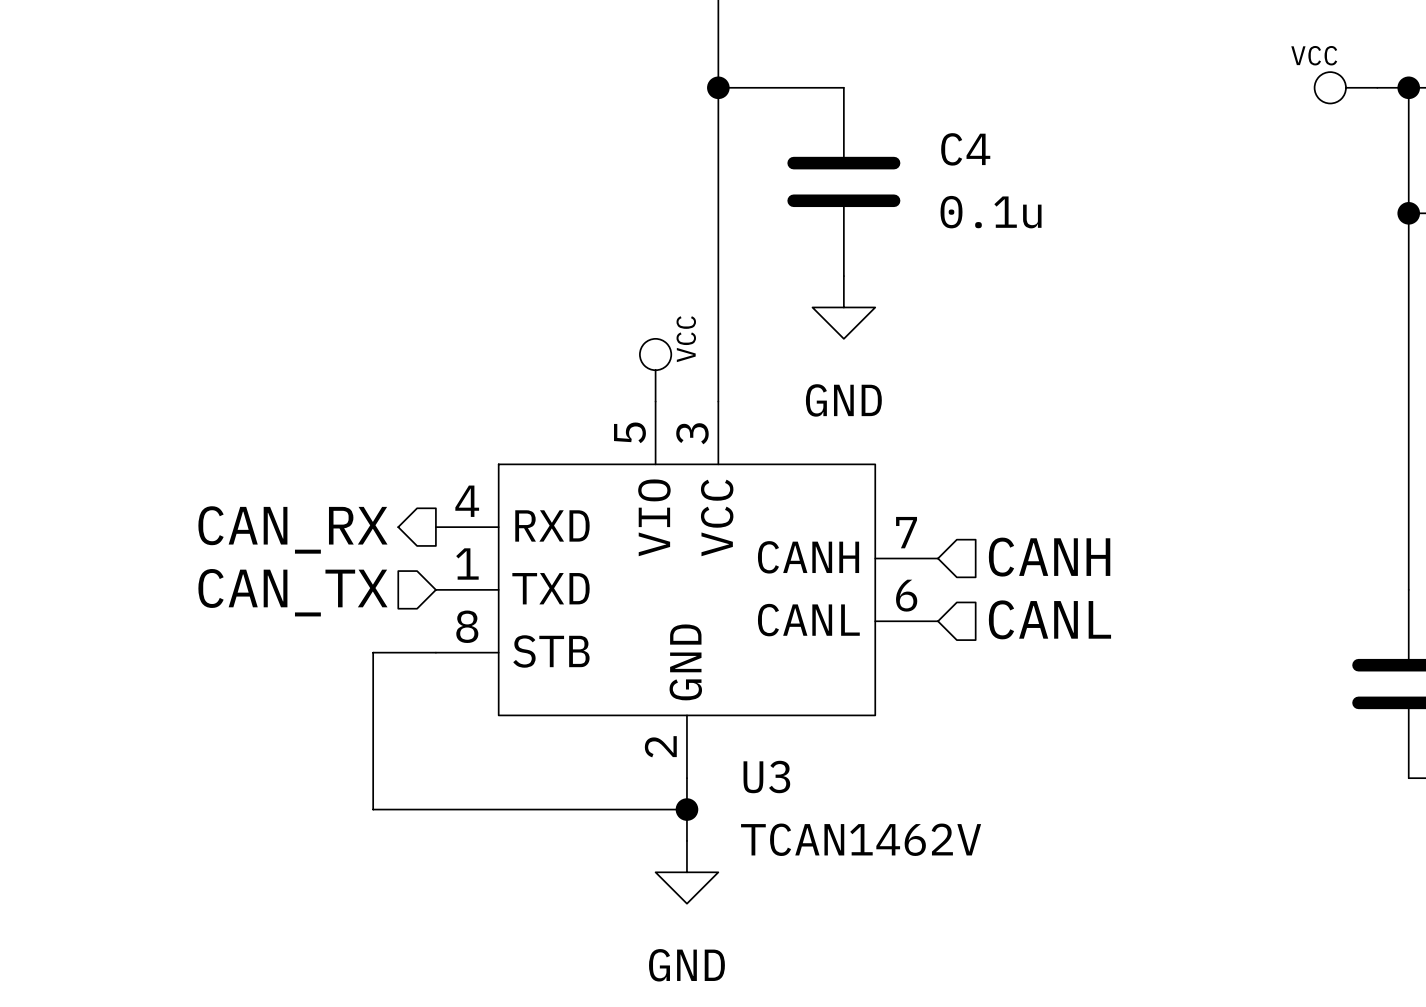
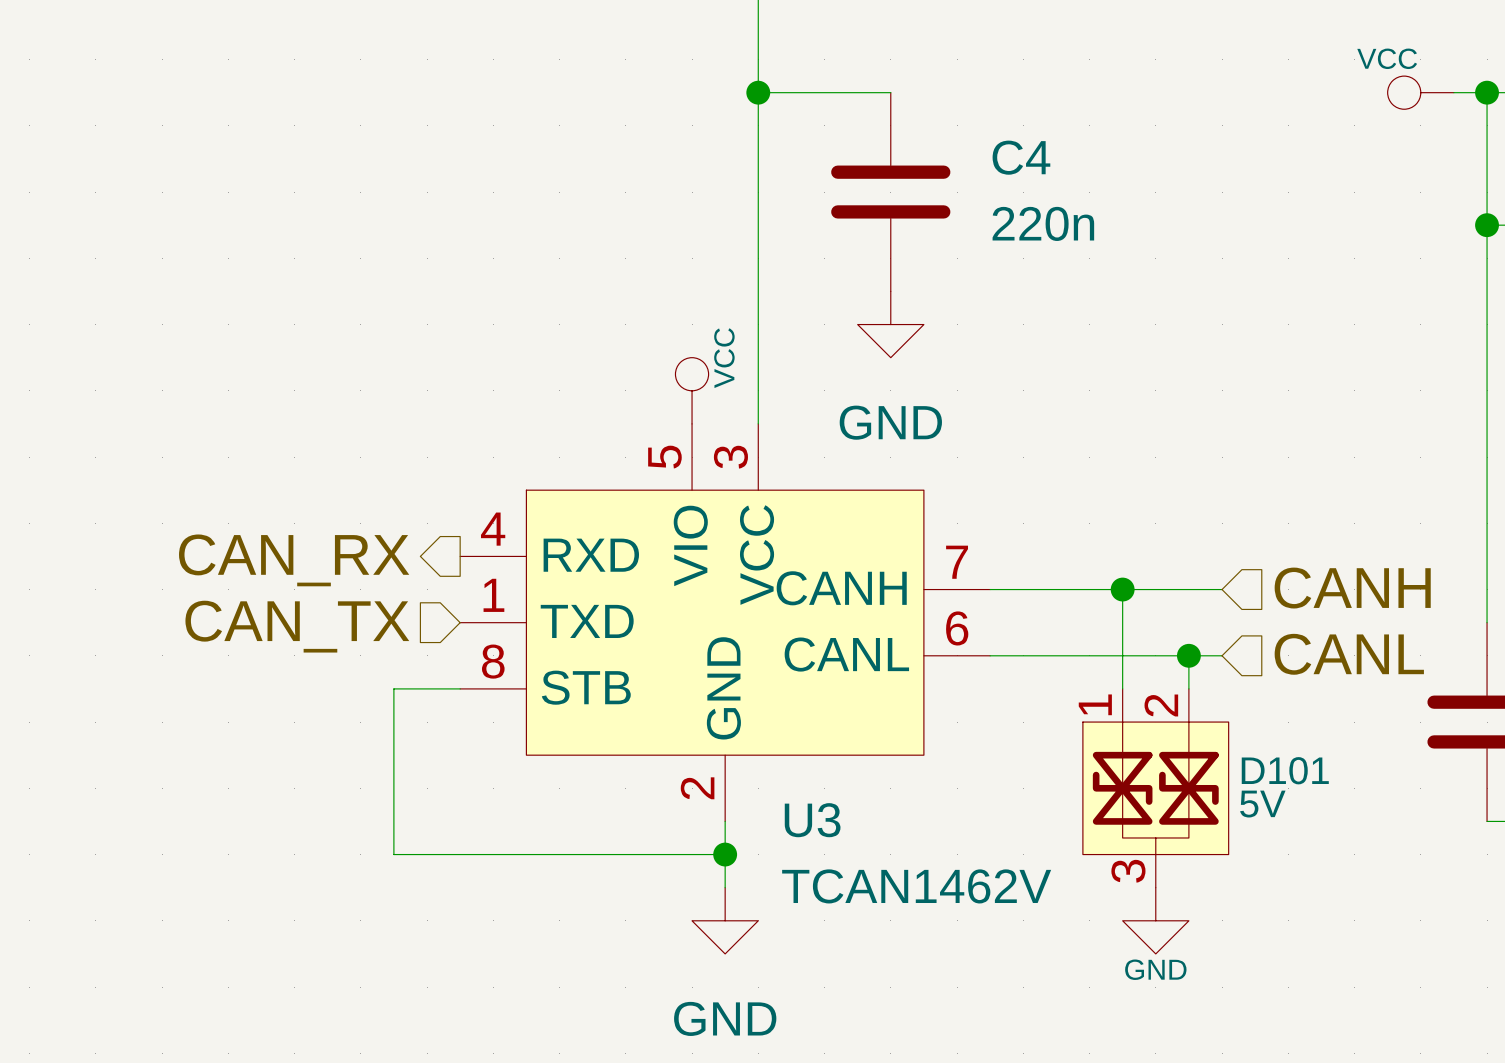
C4 value: 0.1u (991, 212) -> 220n (1043, 223)
hierarchical label position: CANH (1049, 557) -> CANH (1352, 588)
wire: none -> (990, 589) (1222, 589)
wire: none -> (1122, 589) (1122, 688)
junction: none -> (1122, 589)
hierarchical label position: CANL (1049, 619) -> CANL (1349, 654)
wire: none -> (990, 655) (1222, 655)
wire: none -> (1188, 655) (1188, 688)
junction: none -> (1188, 655)
D101: none -> 5V (1155, 788)
power symbol: none -> GND (1155, 920)

